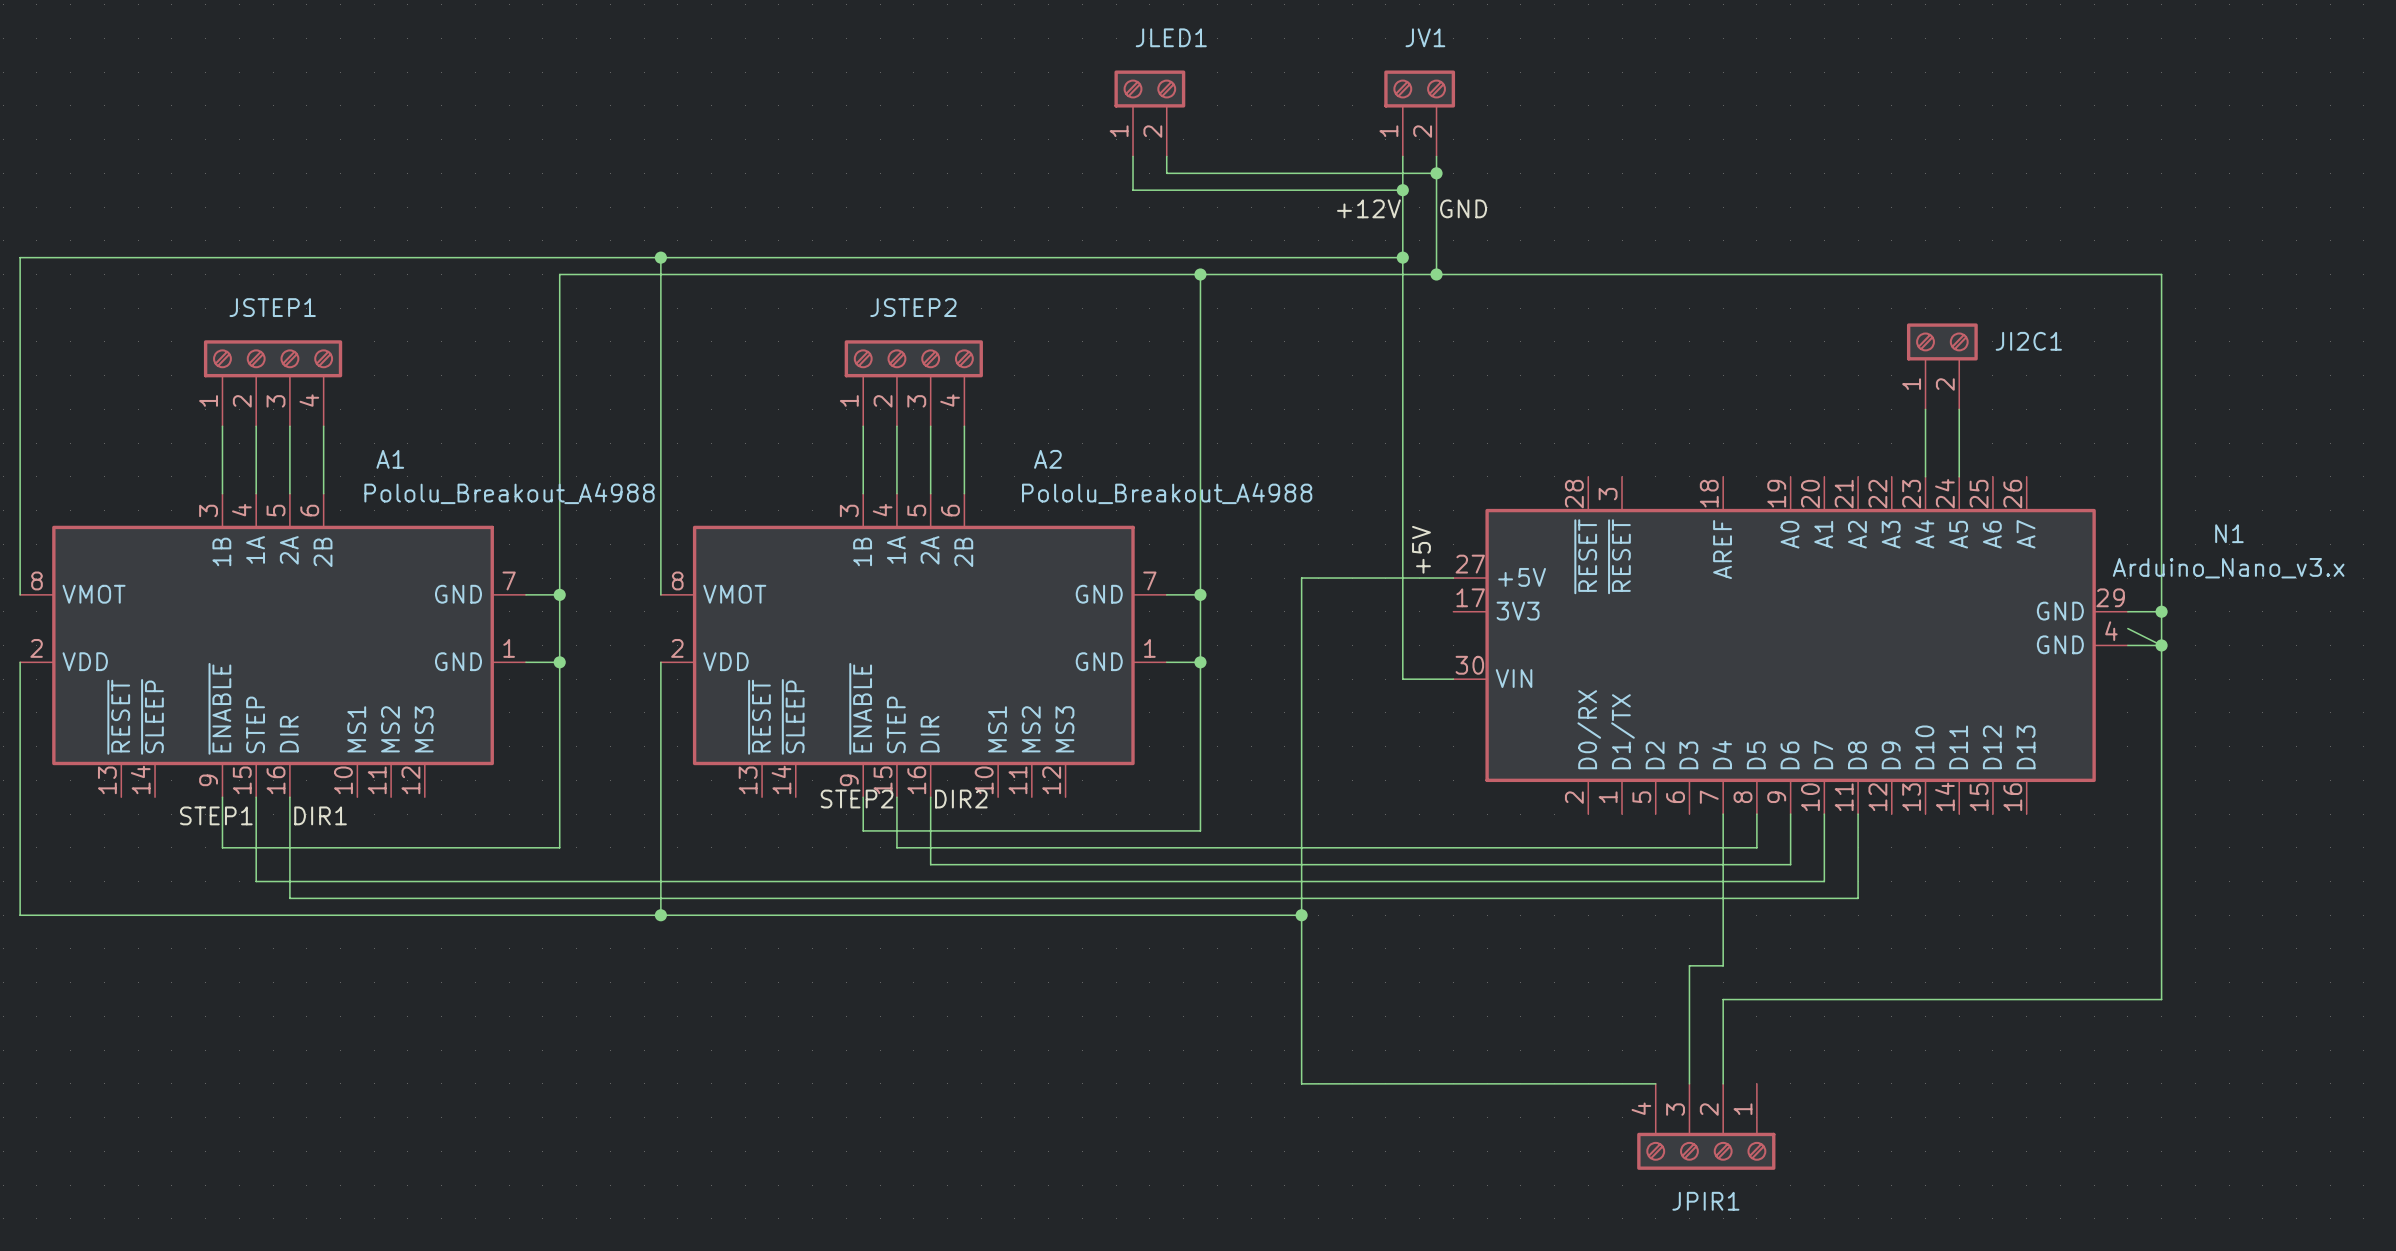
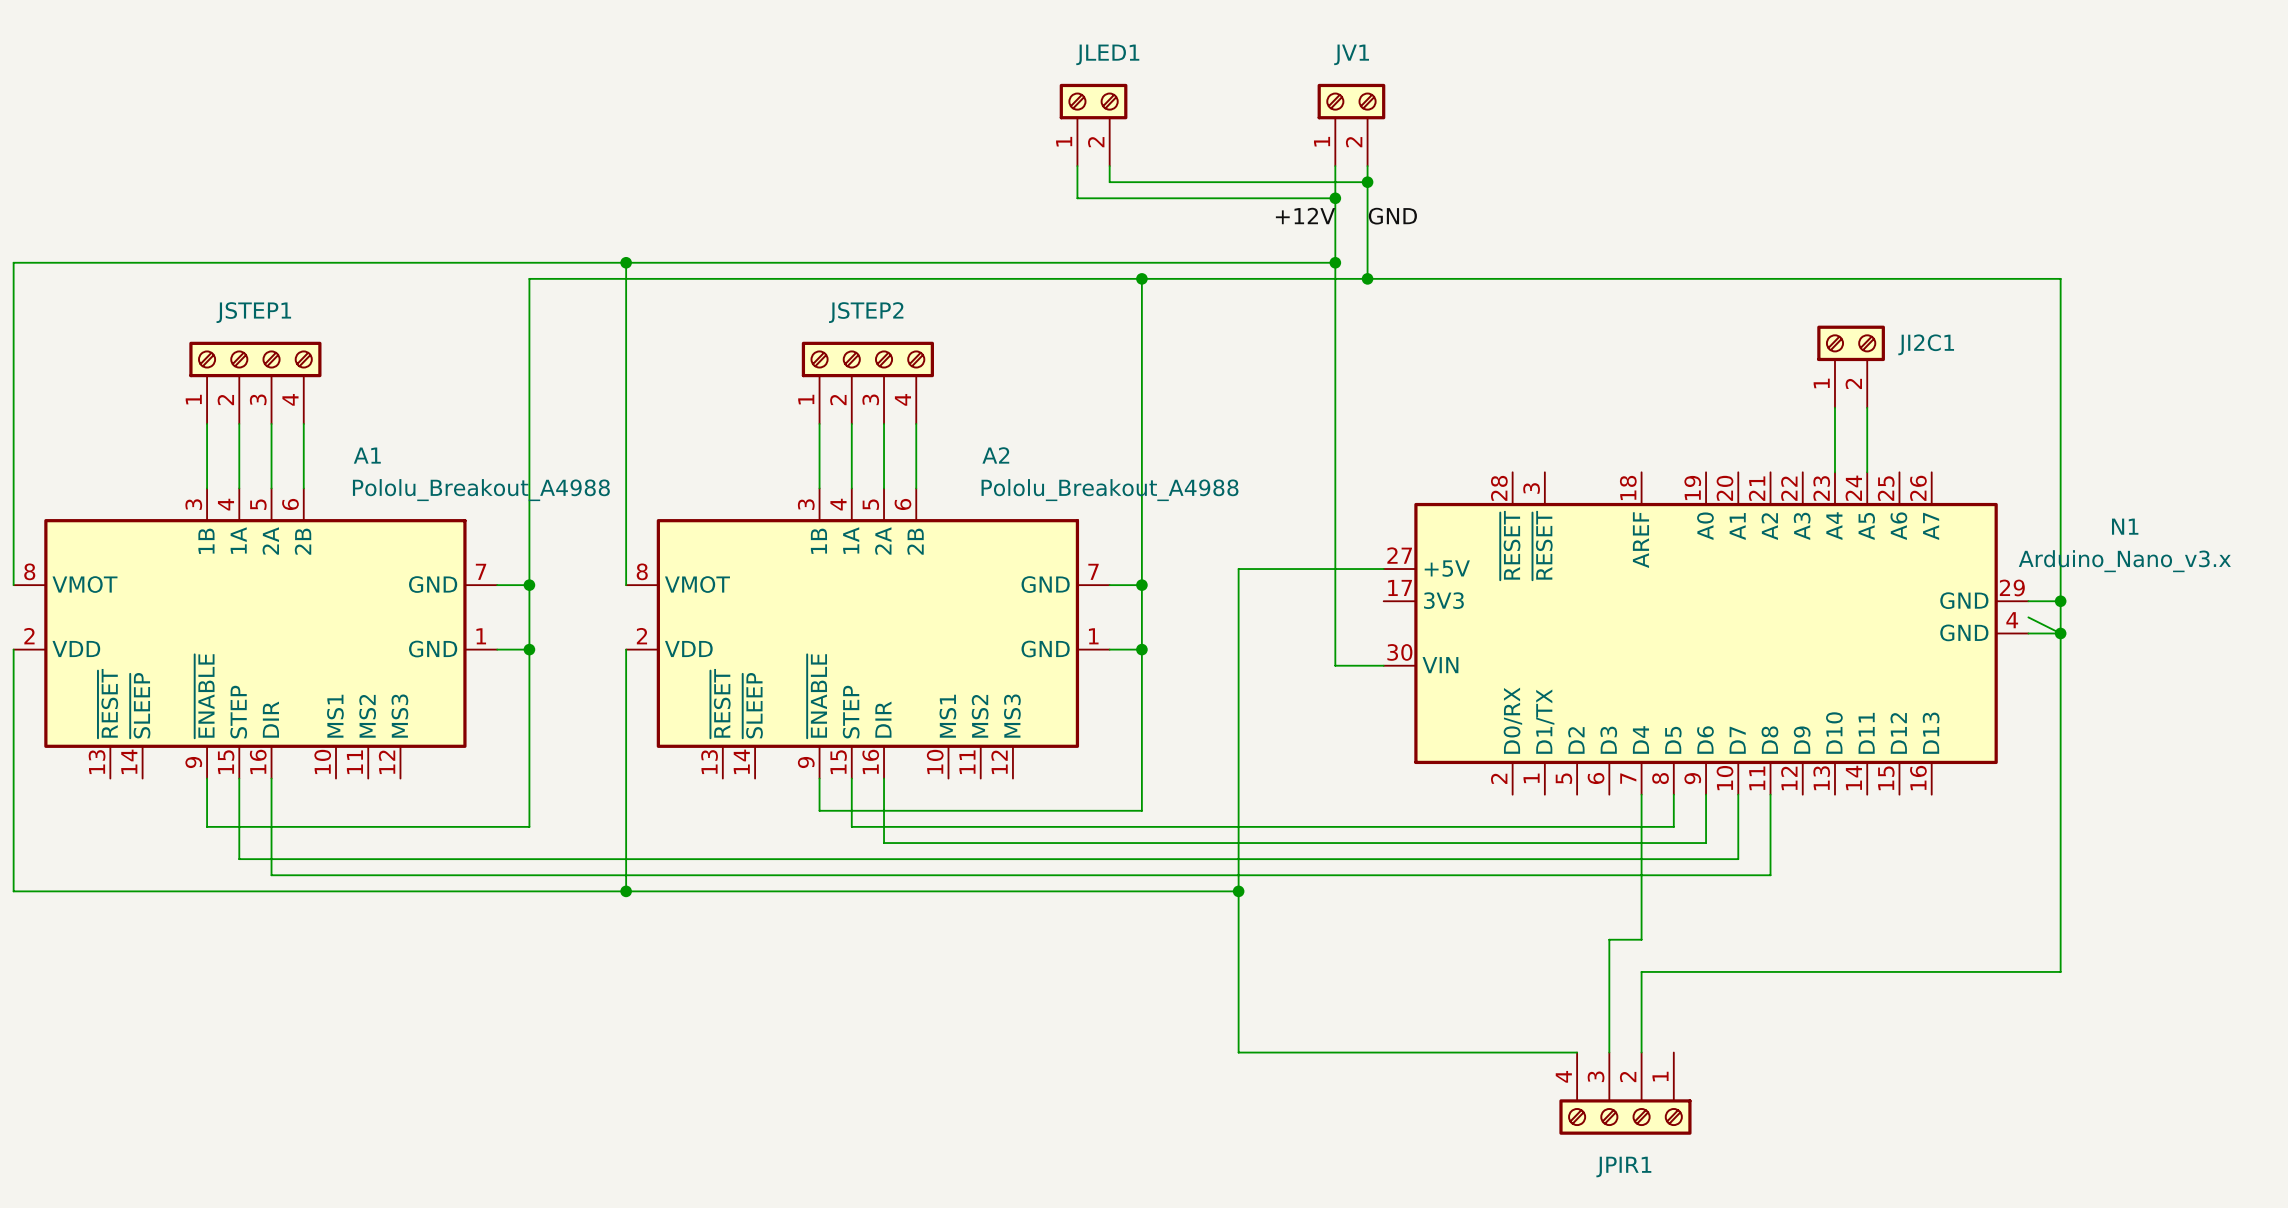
label: +5V (1421, 549) -> none
label: STEP2 (857, 799) -> none
label: DIR2 (961, 799) -> none
label: STEP1 (216, 815) -> none
label: DIR1 (320, 815) -> none

